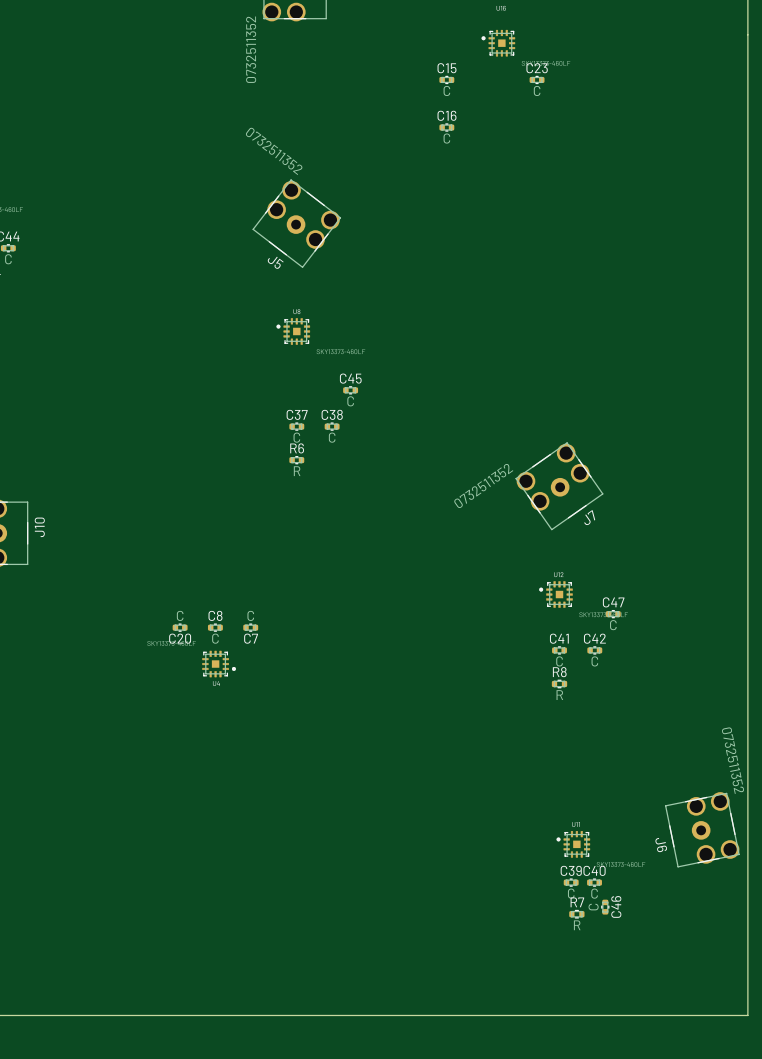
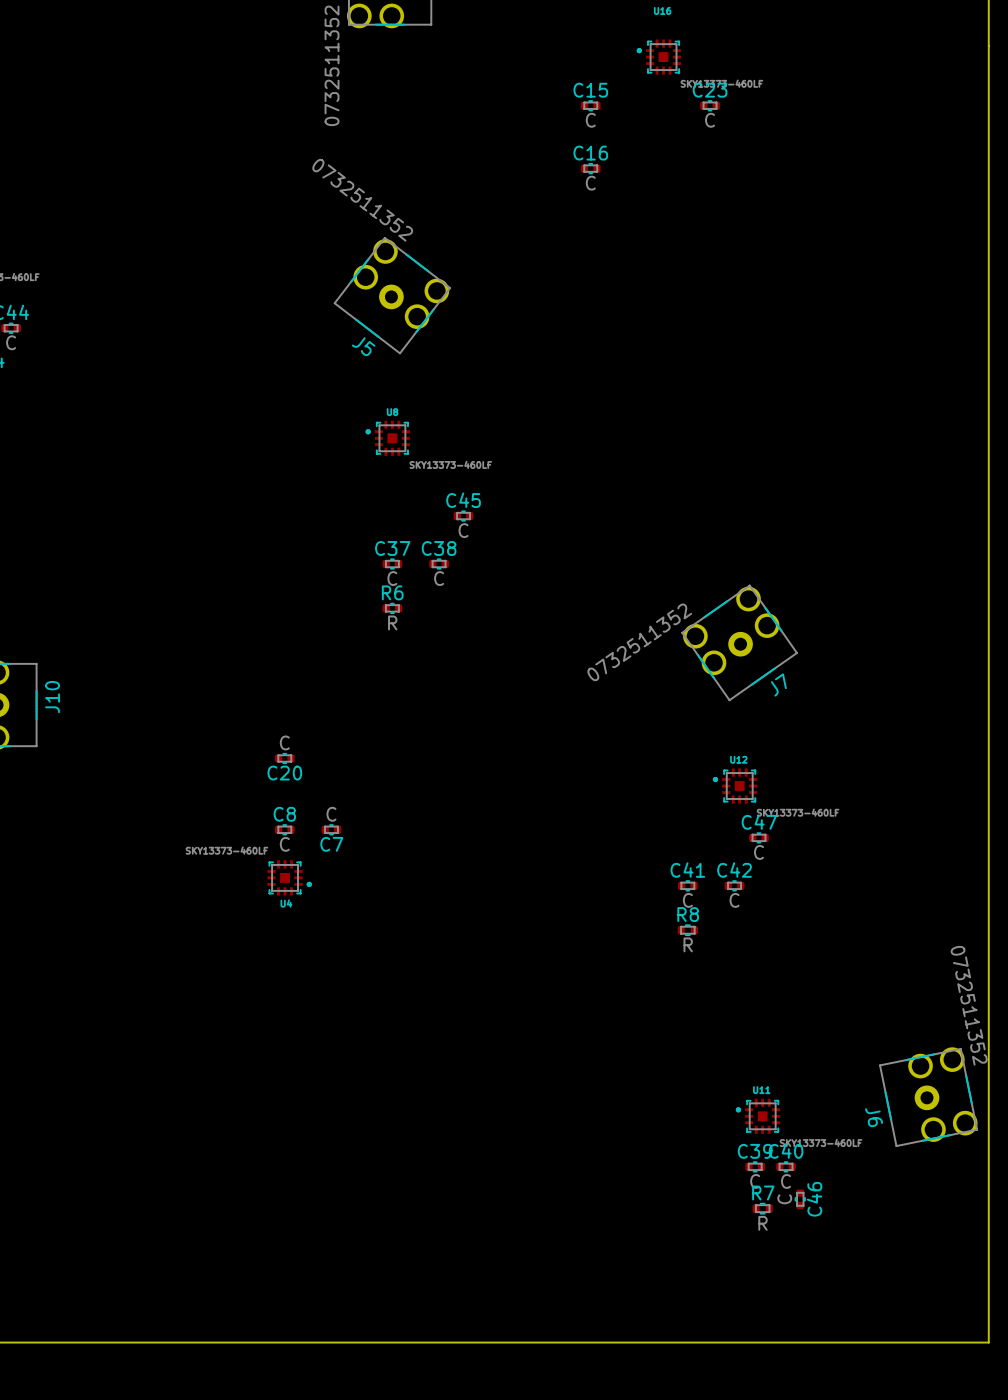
C47 position: (613, 614) -> (758, 837)
C20 position: (180, 627) -> (284, 758)
C41 position: (559, 650) -> (687, 885)
C42 position: (594, 650) -> (734, 885)
R8 position: (559, 683) -> (687, 930)

